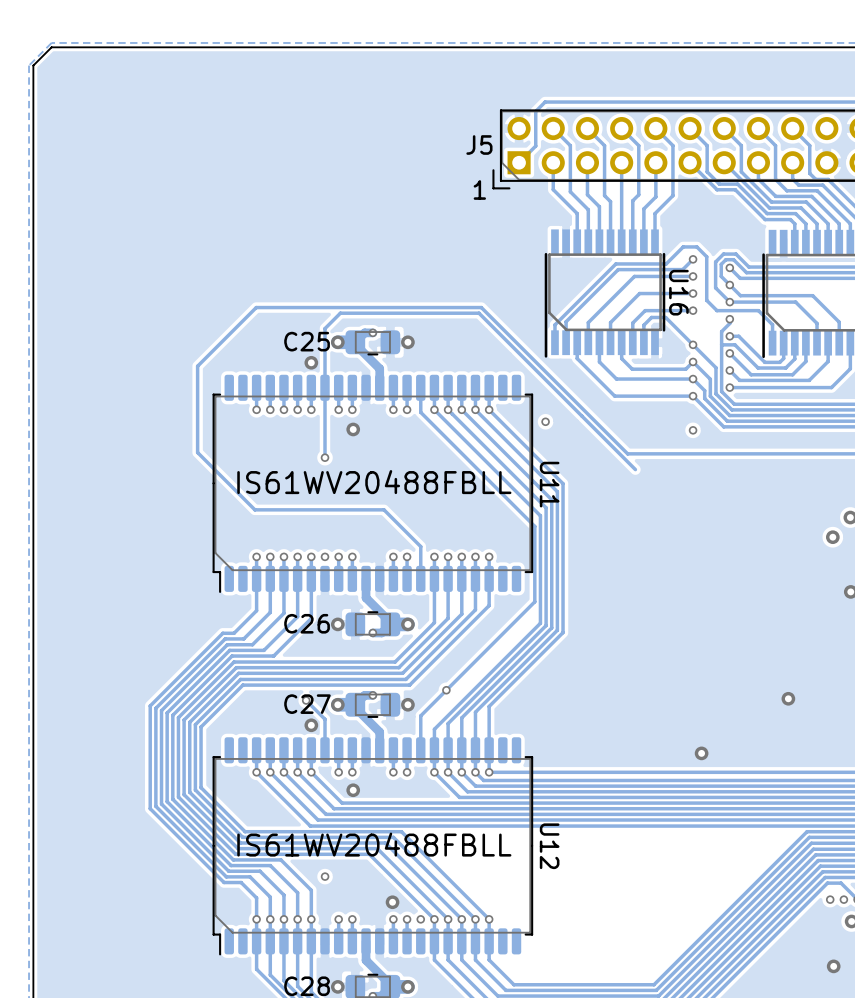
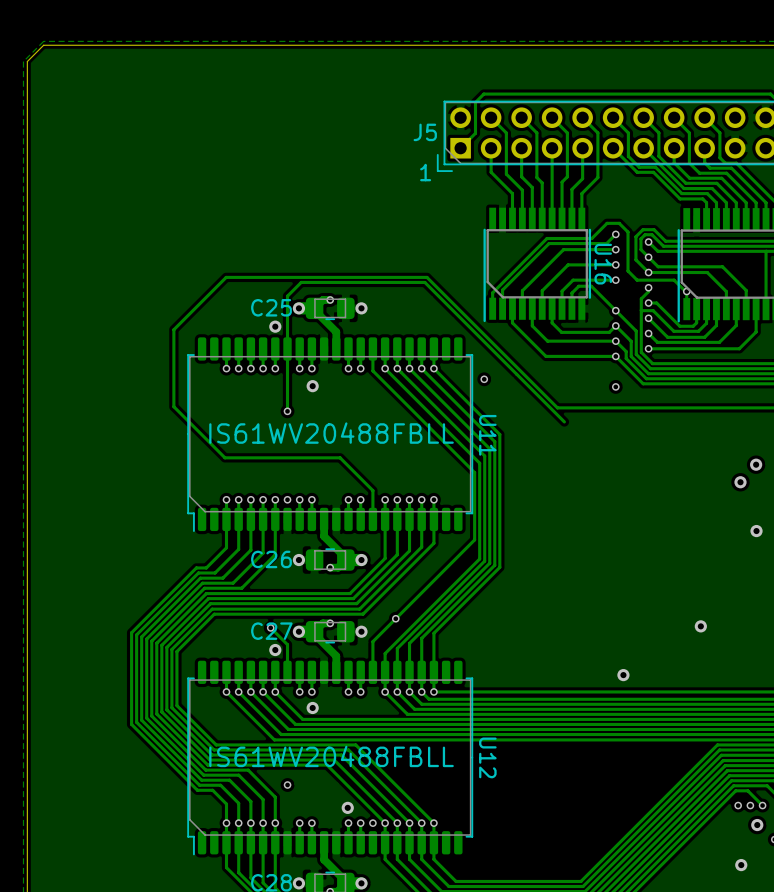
via: none -> (686, 291)

